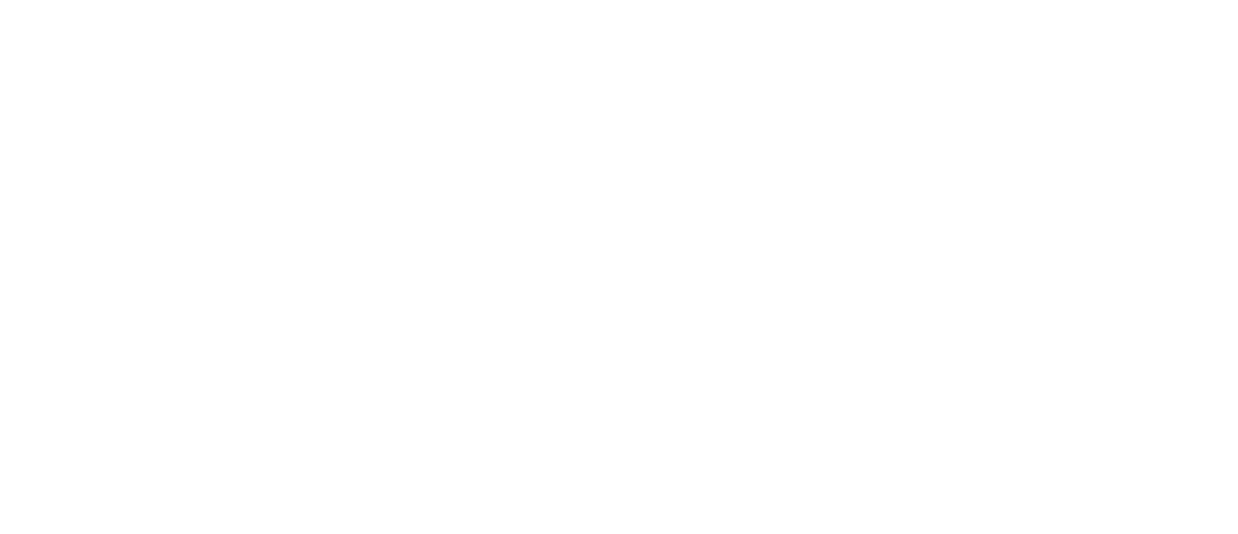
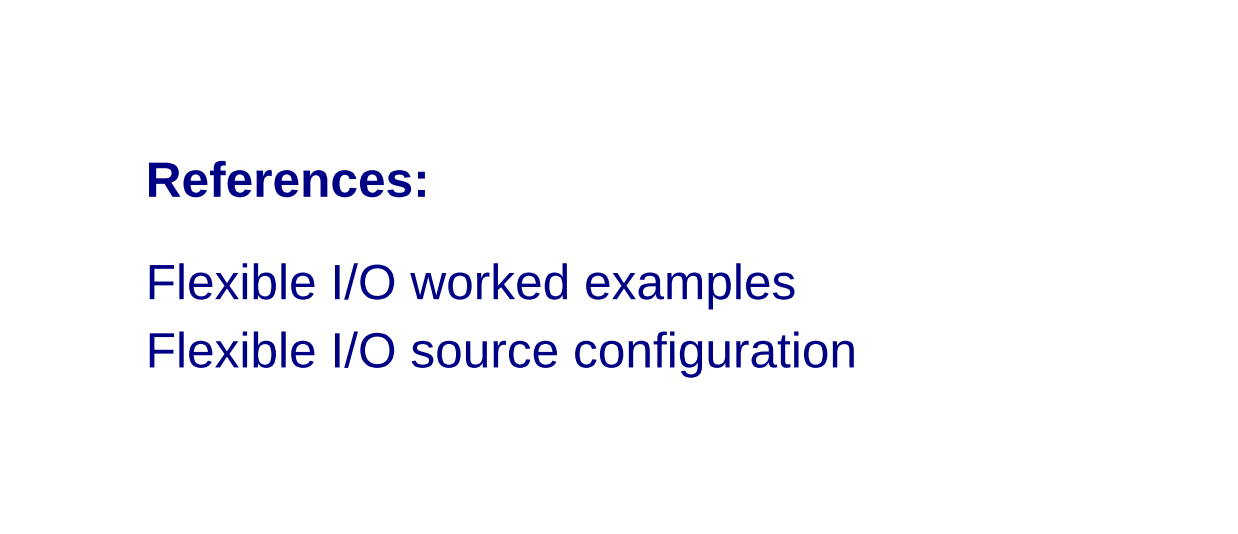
text: none -> References: (286, 179)
text: none -> Flexible I/O worked examples (472, 286)
text: none -> Flexible I/O source configuration (501, 354)

